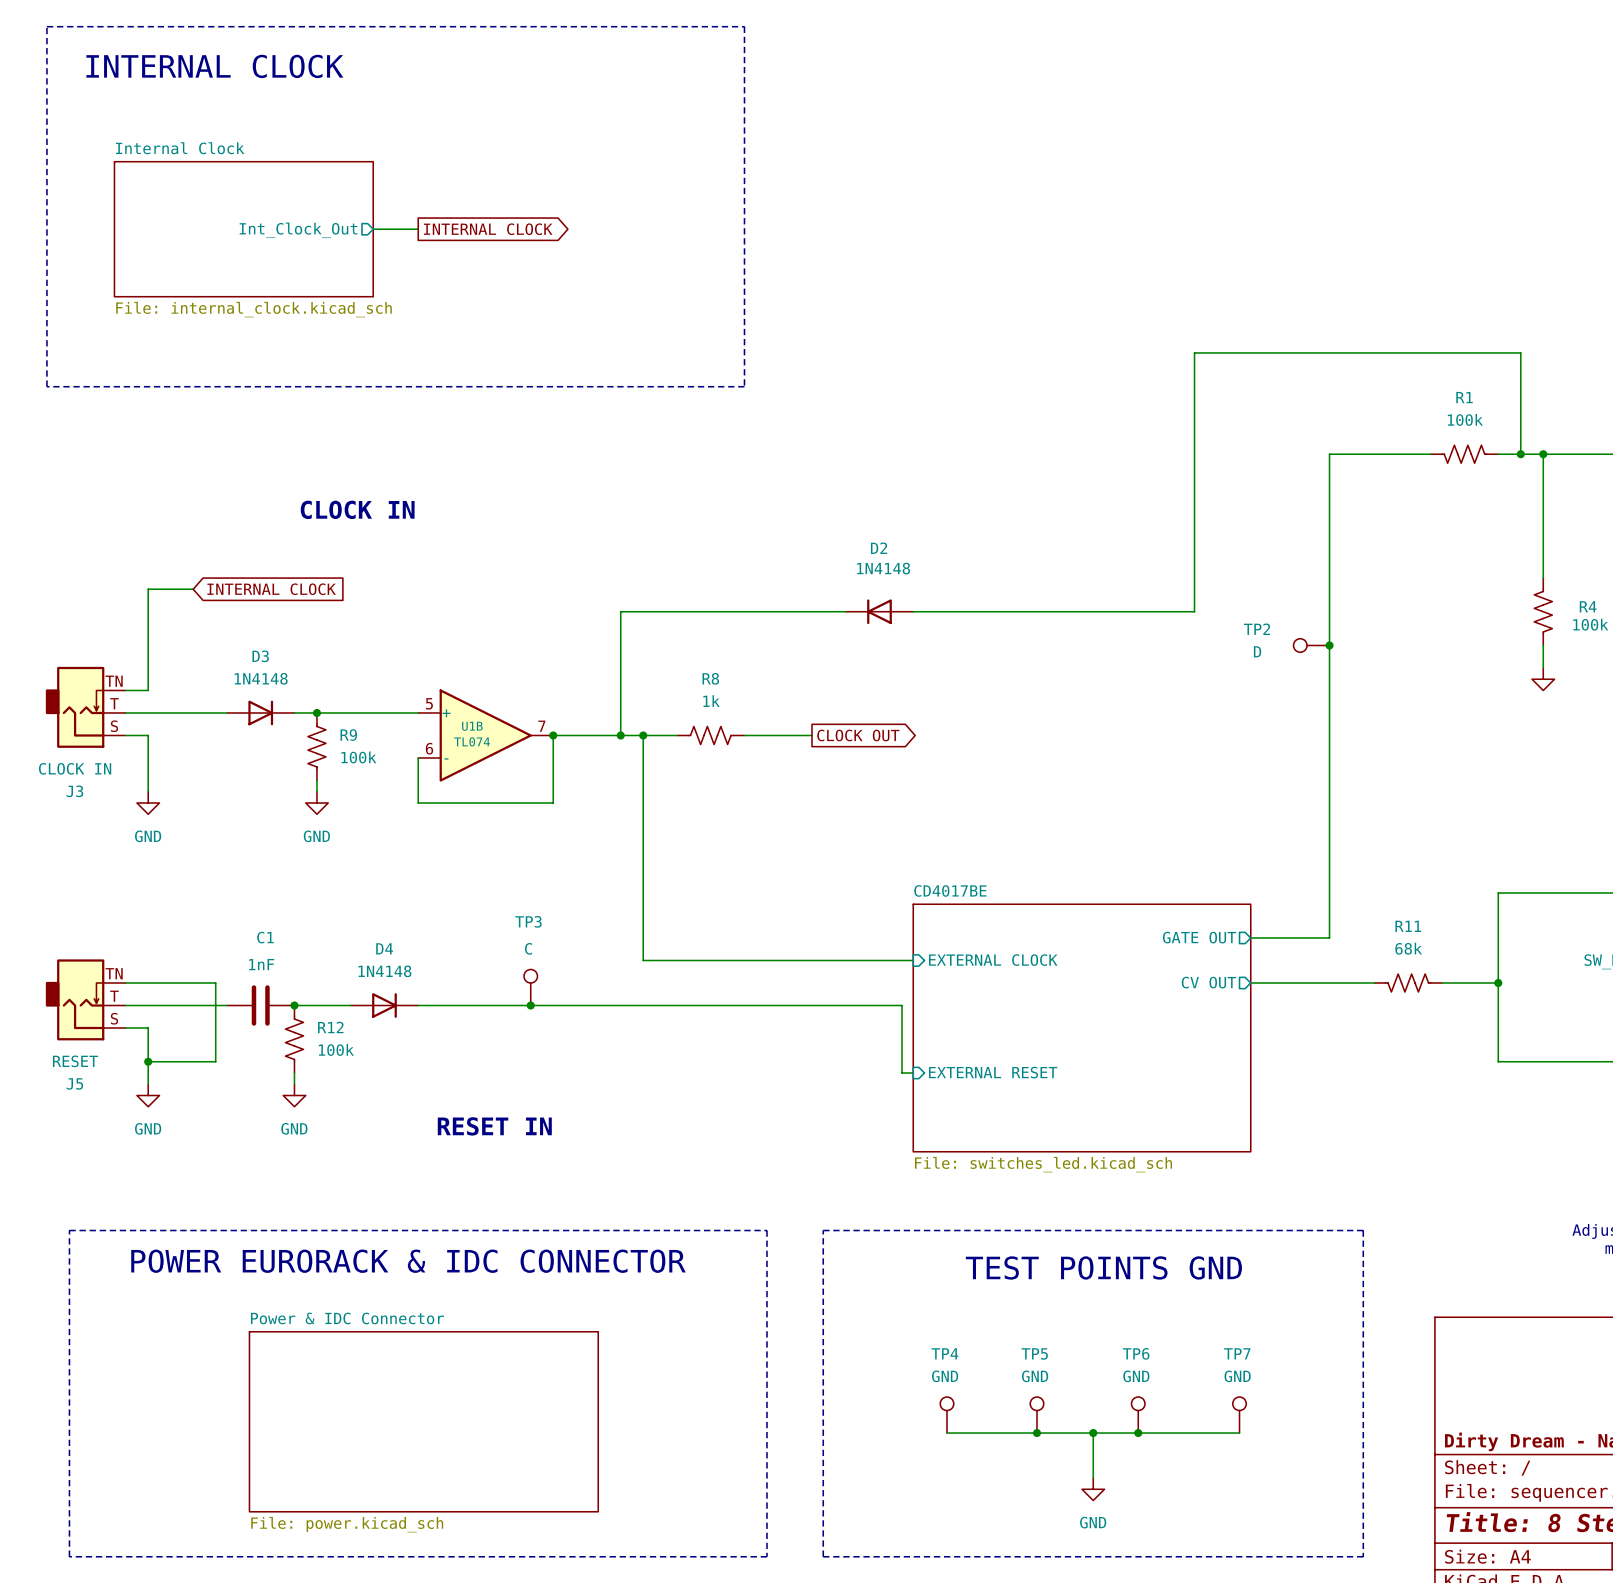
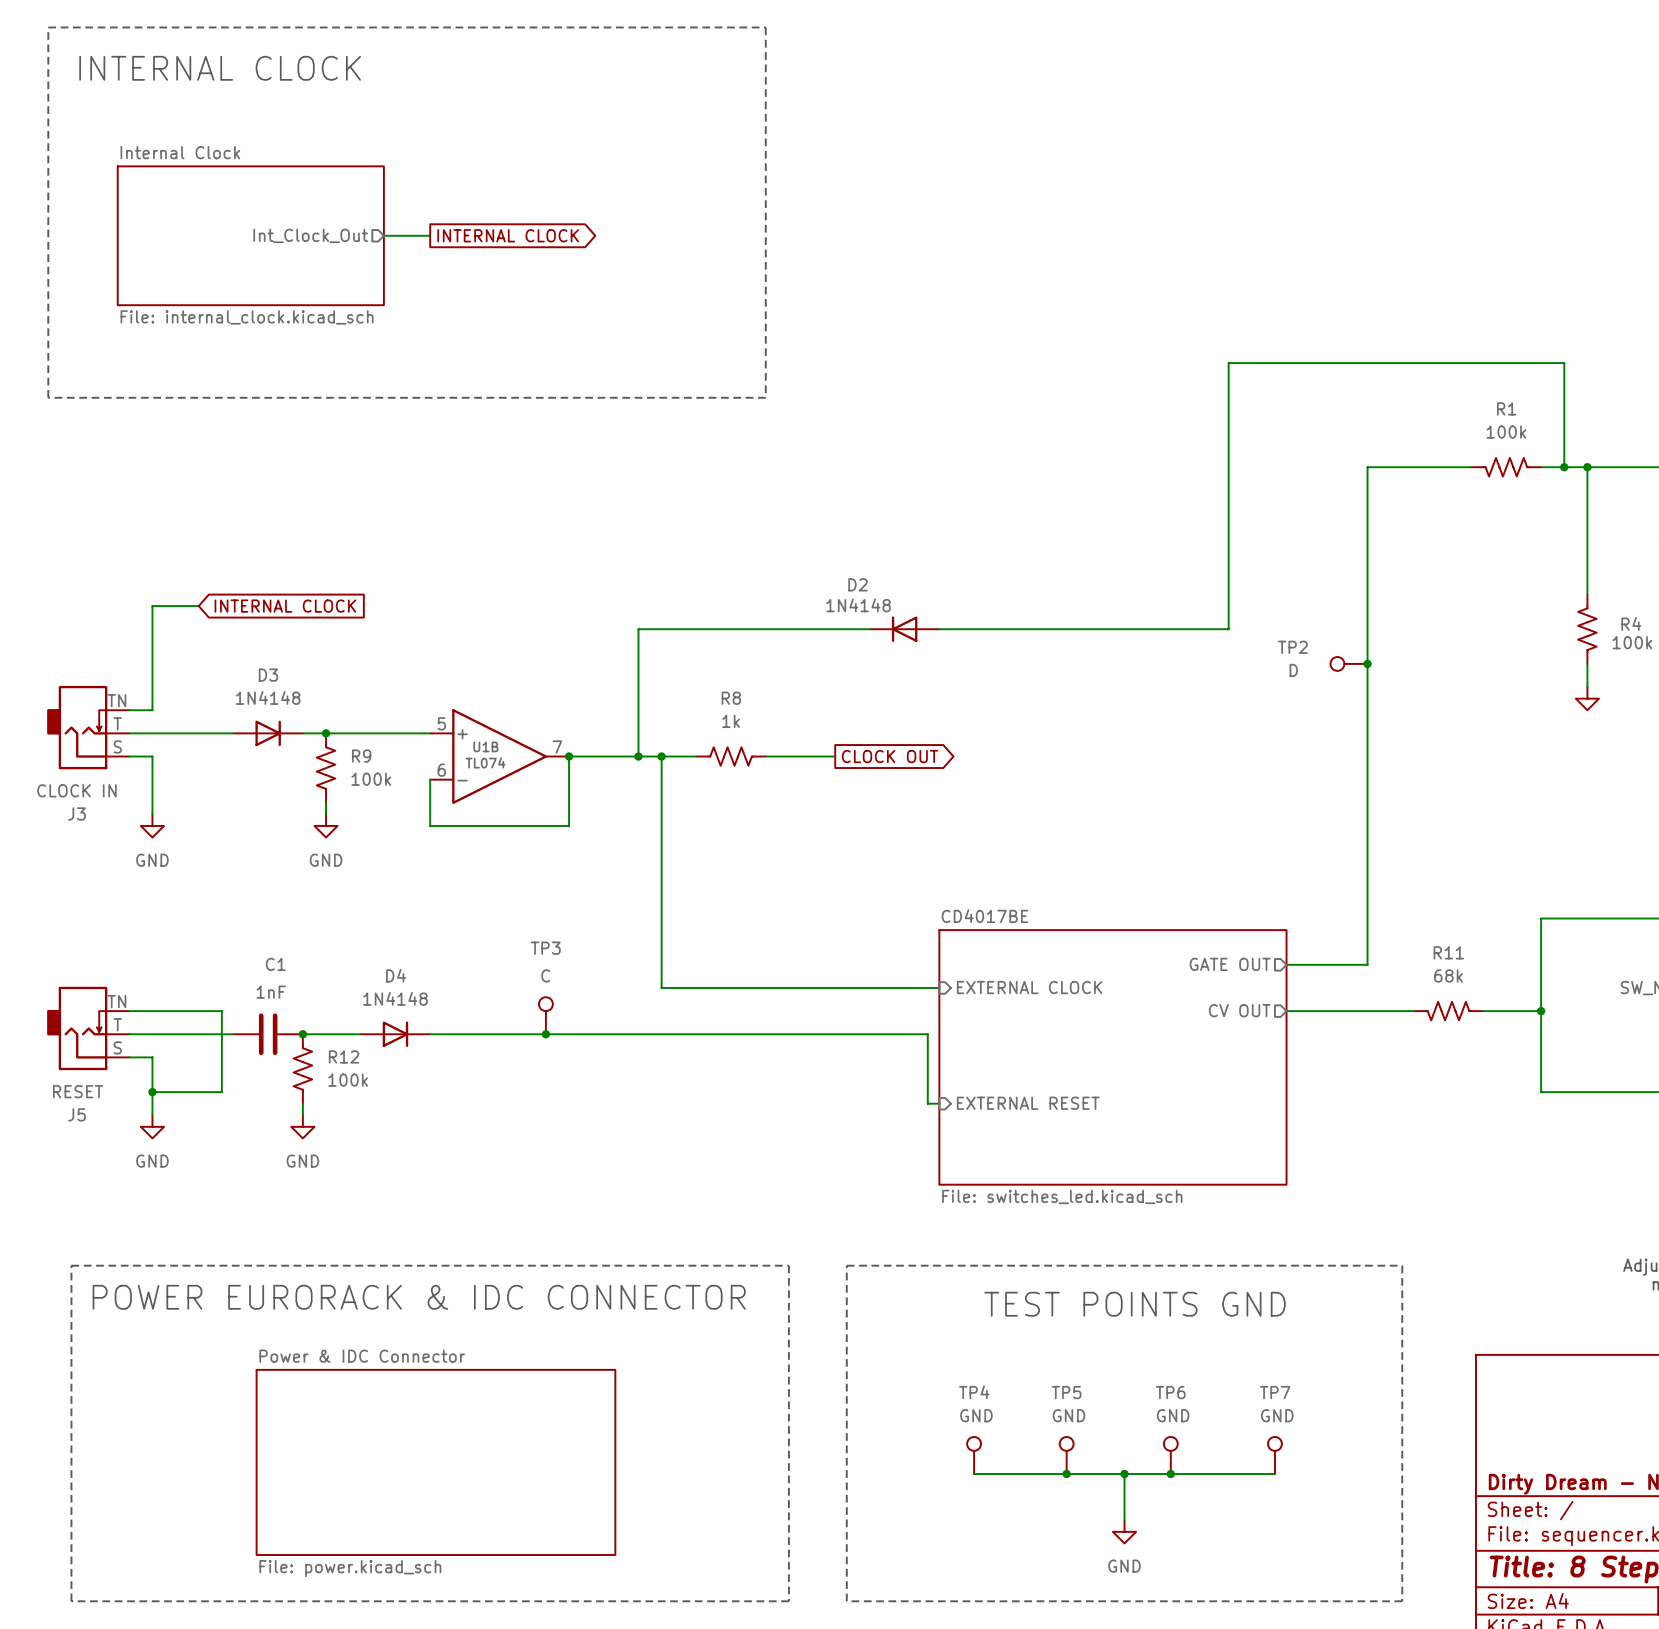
text: CLOCK IN (357, 509) -> none
D2 name position: D2 (879, 548) -> D2 (857, 584)
D2 value position: 1N4148 (883, 568) -> 1N4148 (858, 605)
text: RESET IN (494, 1126) -> none

